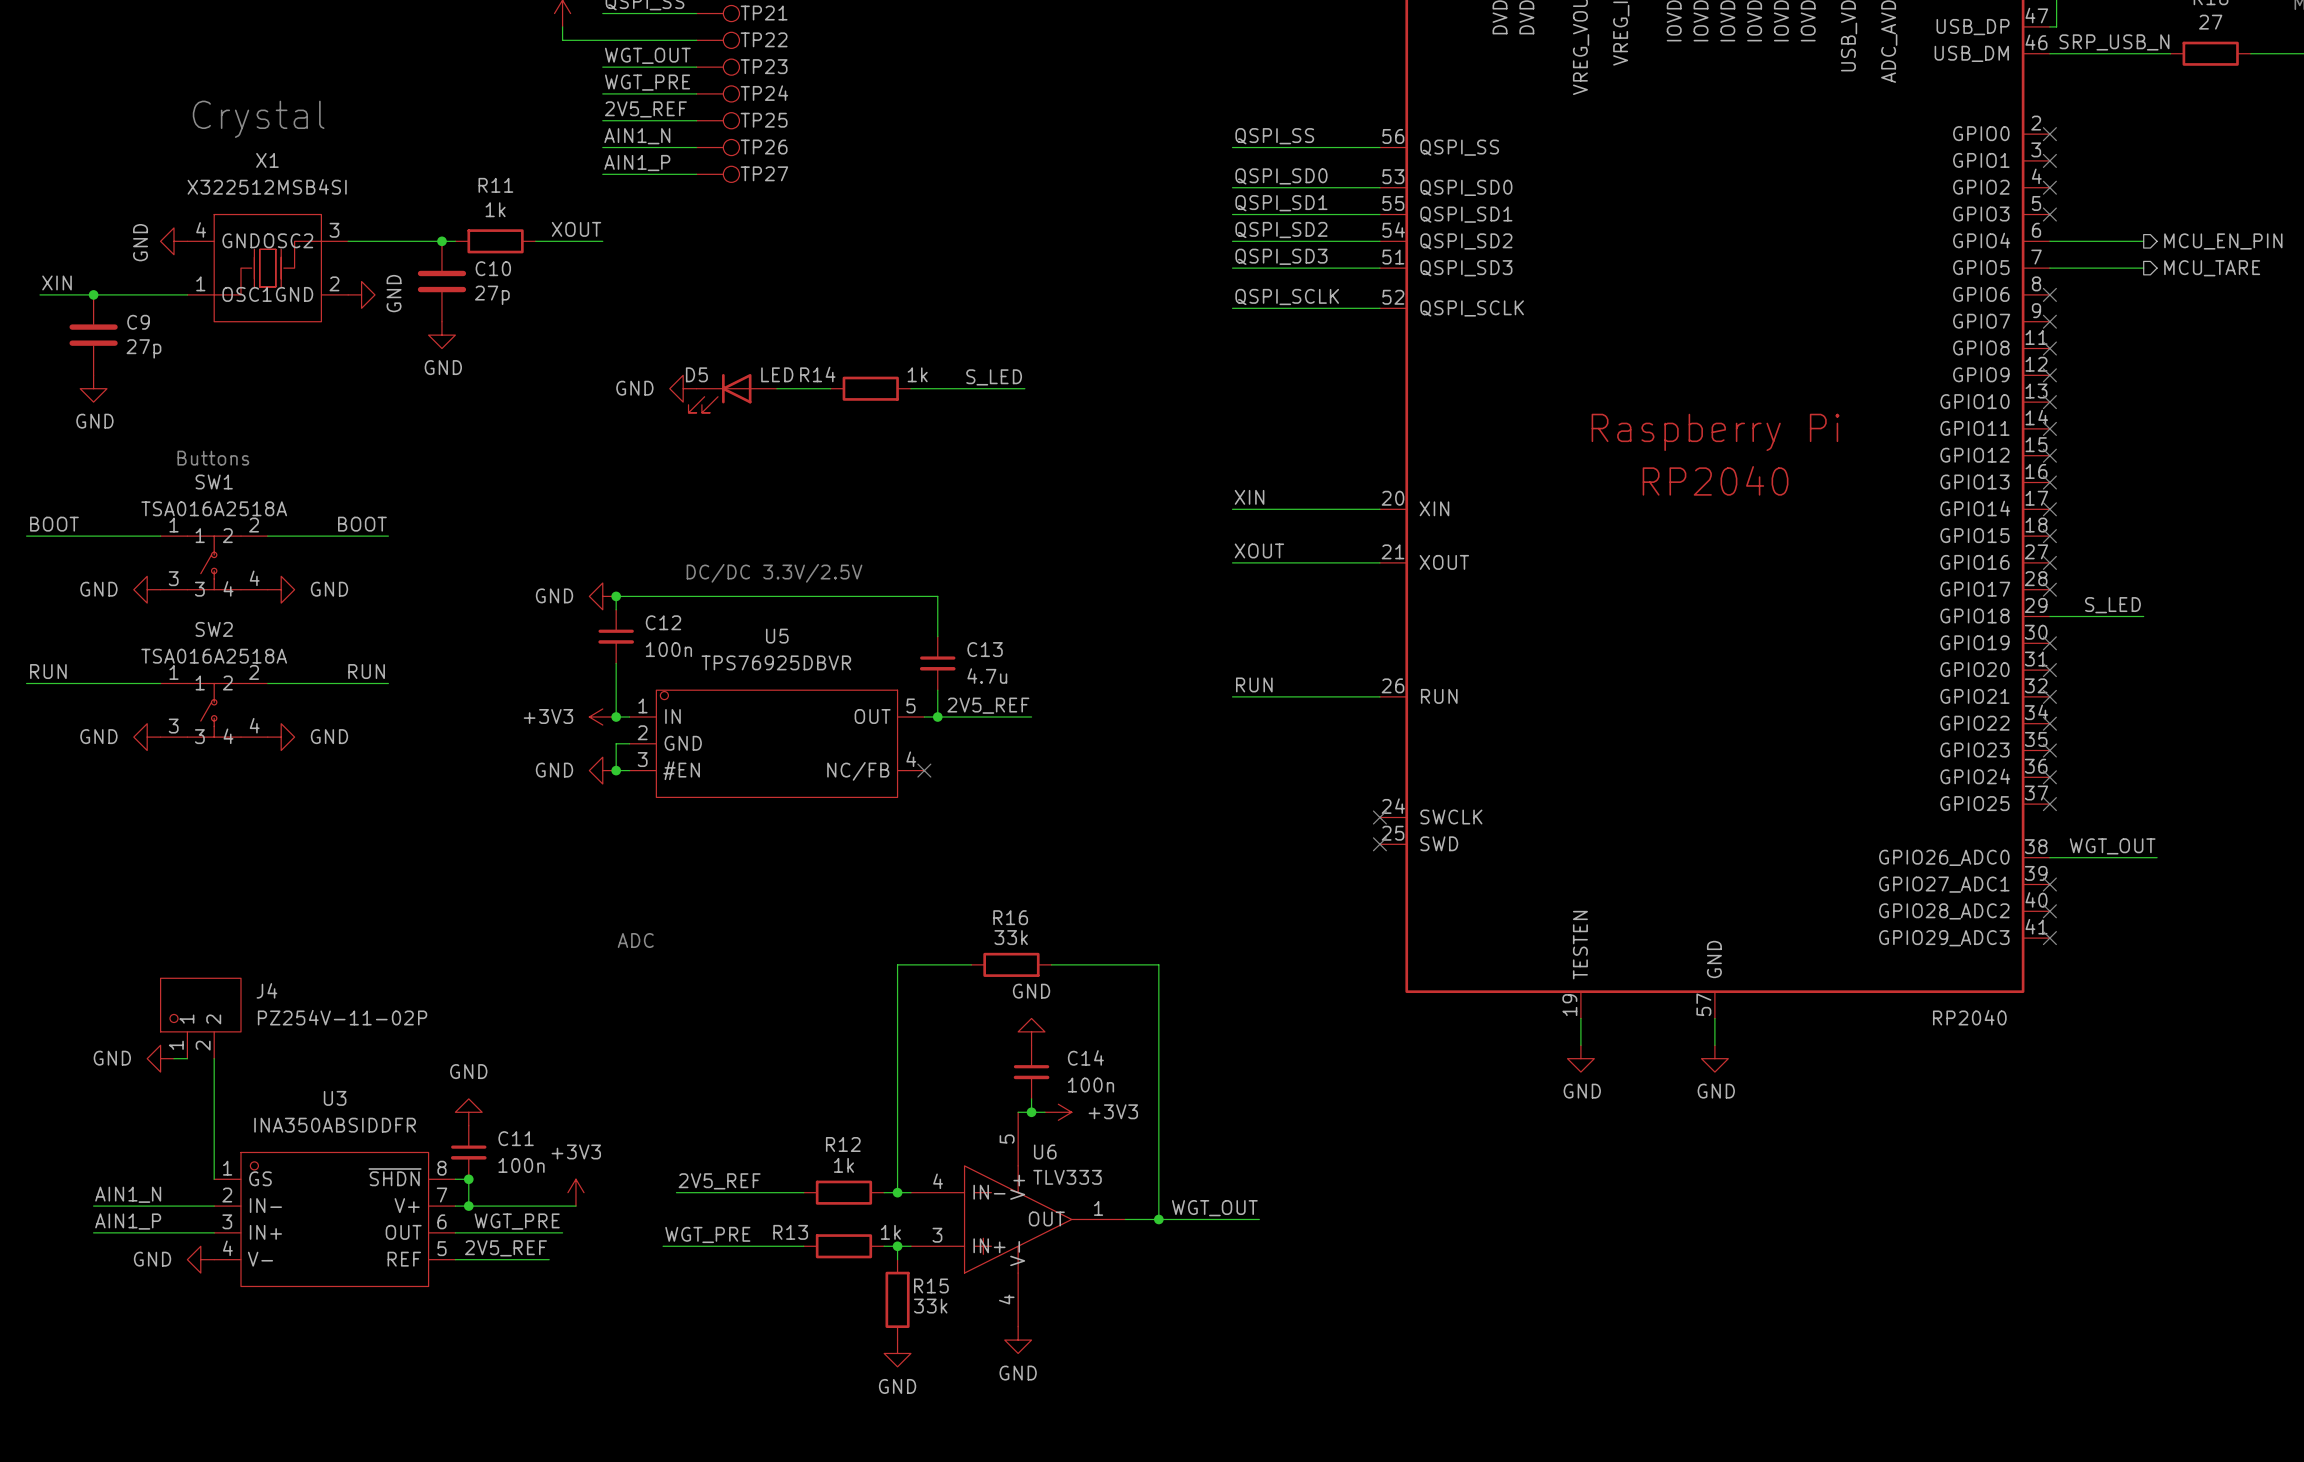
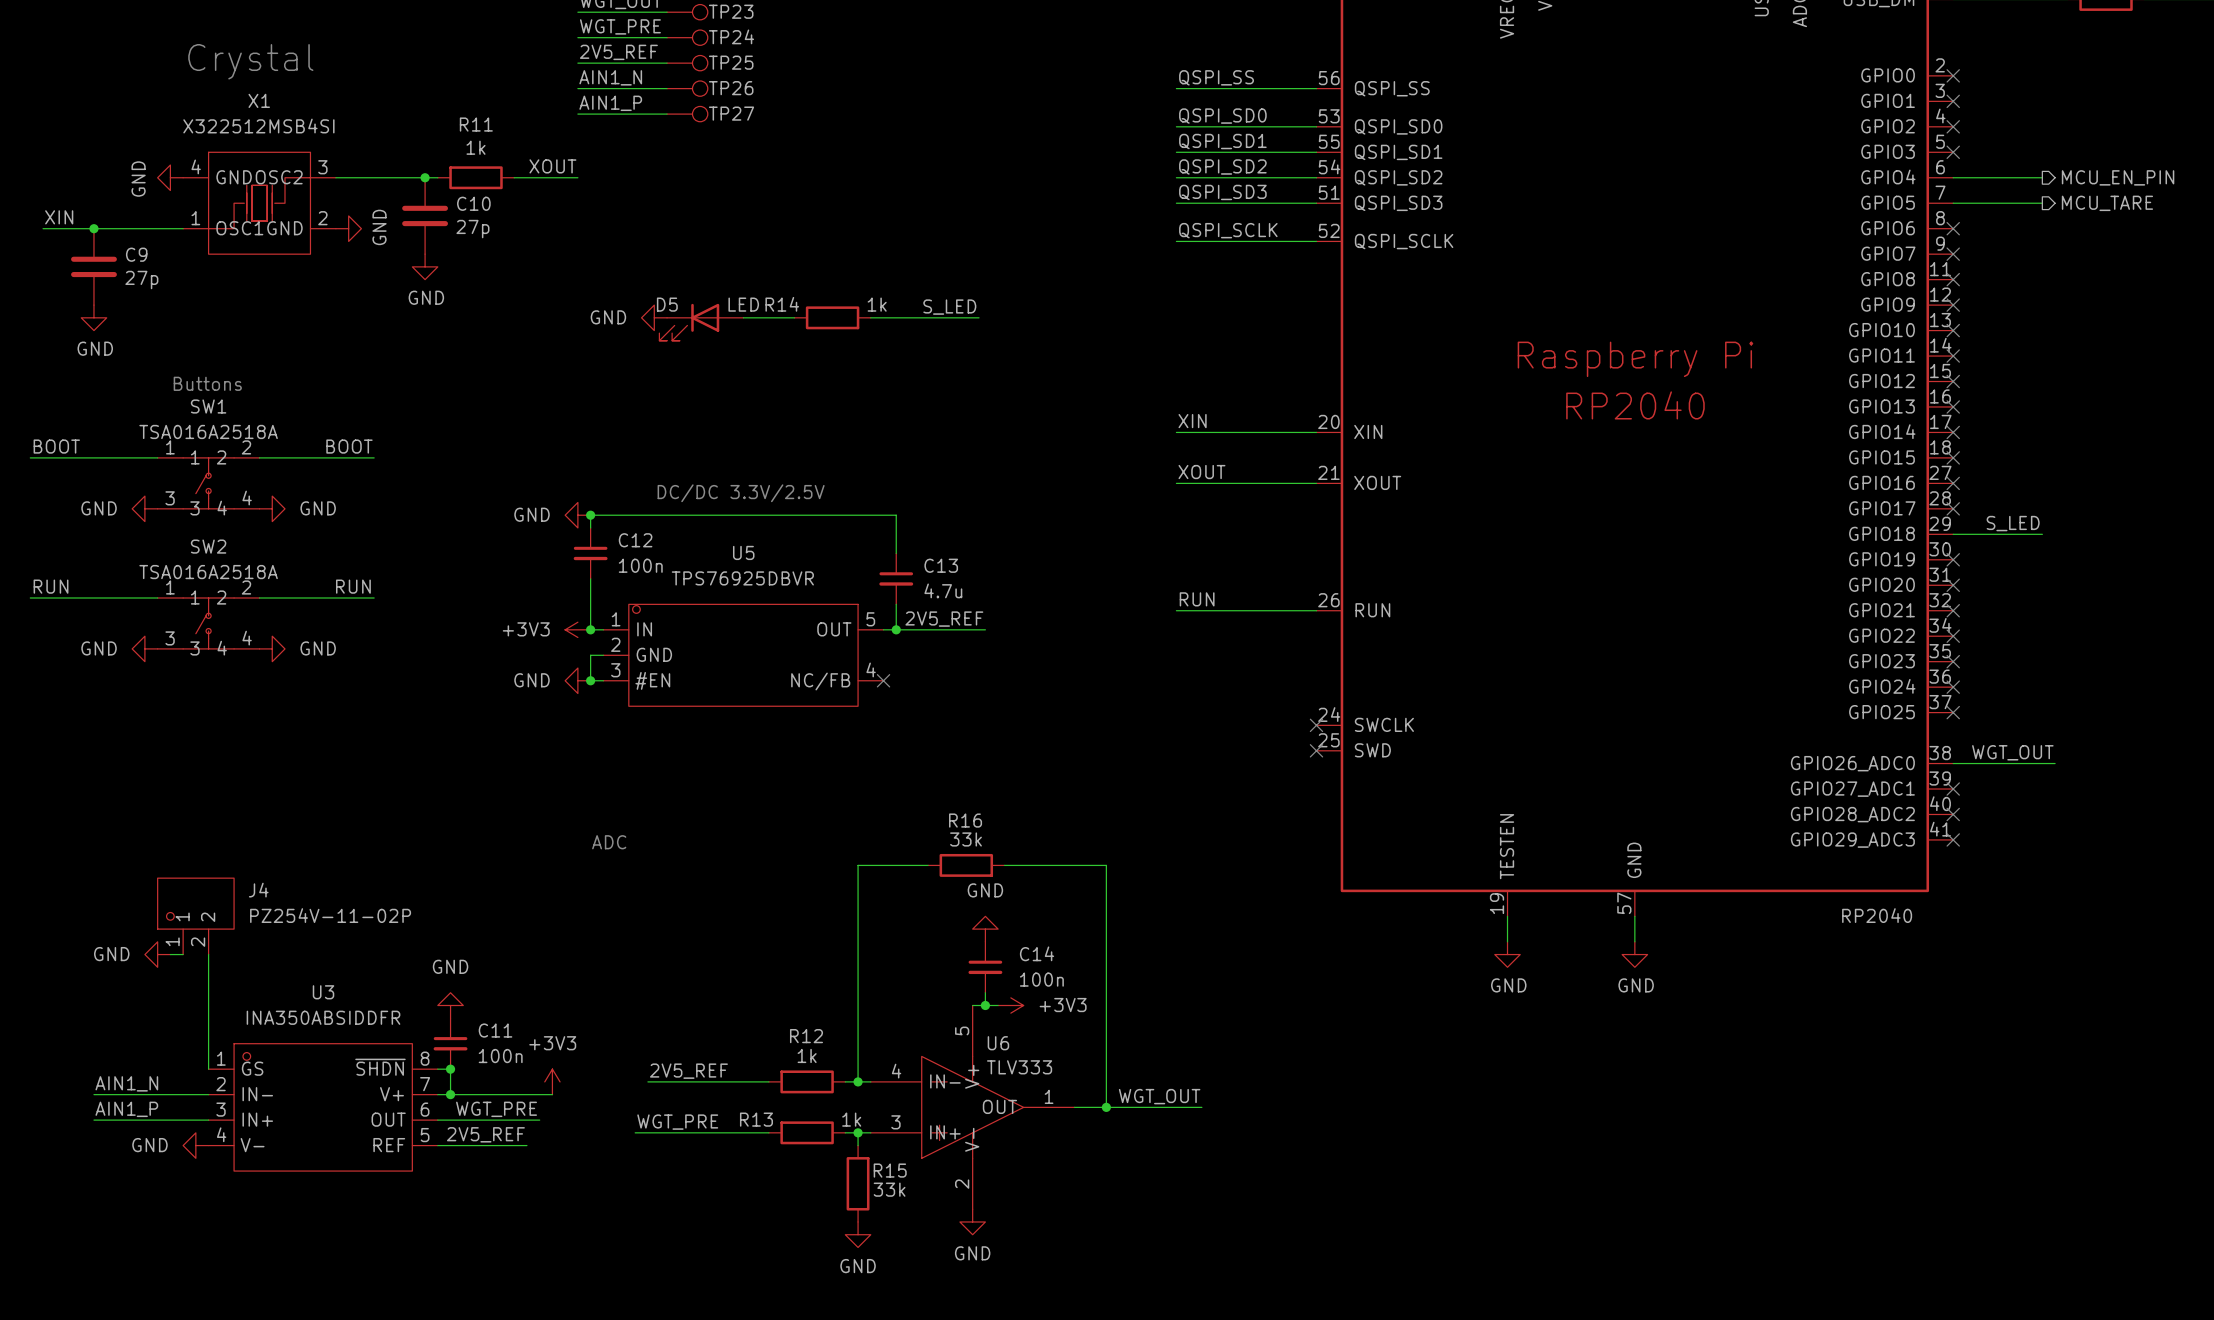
U6 pin number: 4 (1006, 1299) -> 2 (962, 1184)

